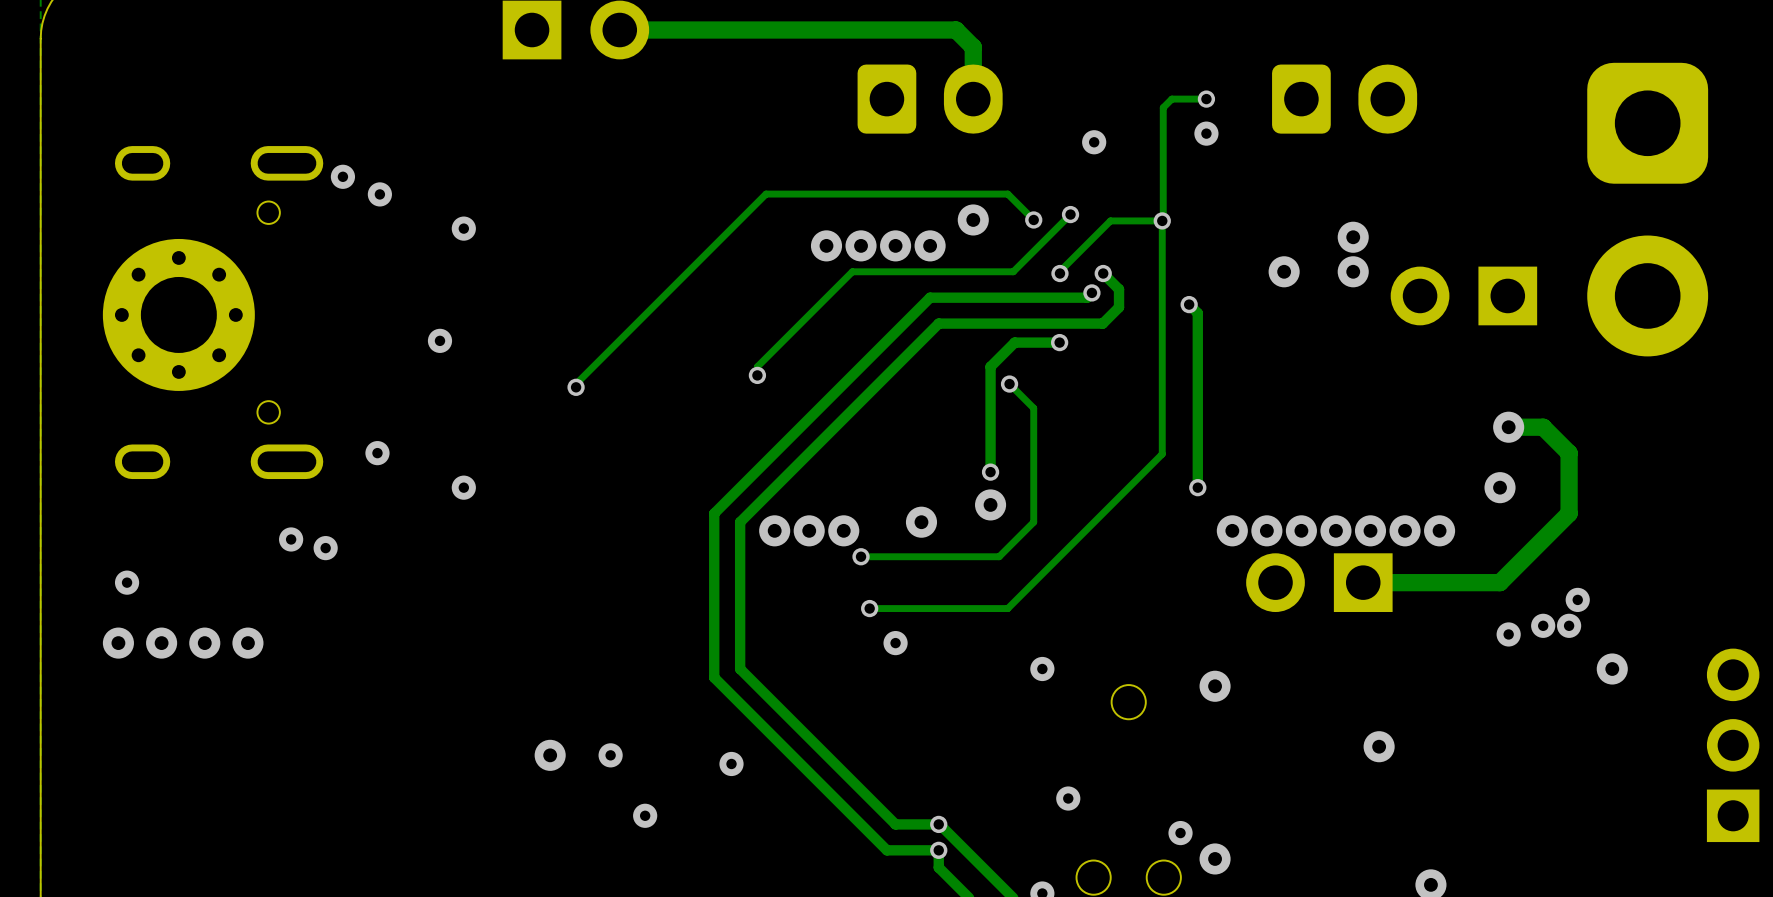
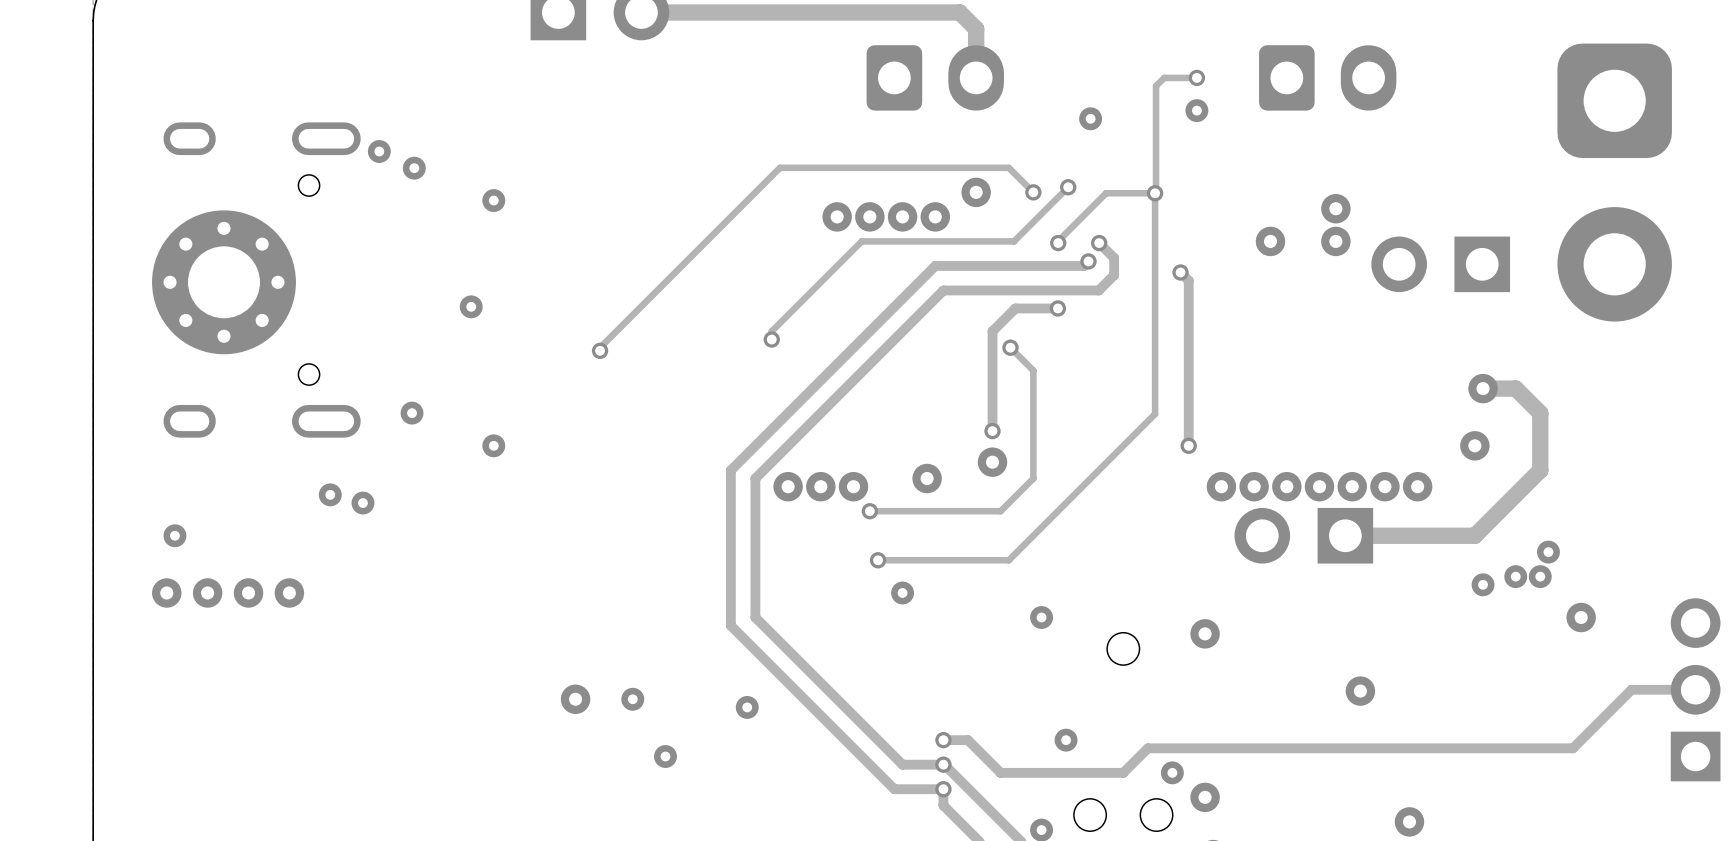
track: none -> (1695, 689) (1631, 689) (1572, 748) (1147, 748) (1123, 772) (1000, 772) (967, 740) (943, 740)
via: none -> (943, 740)

